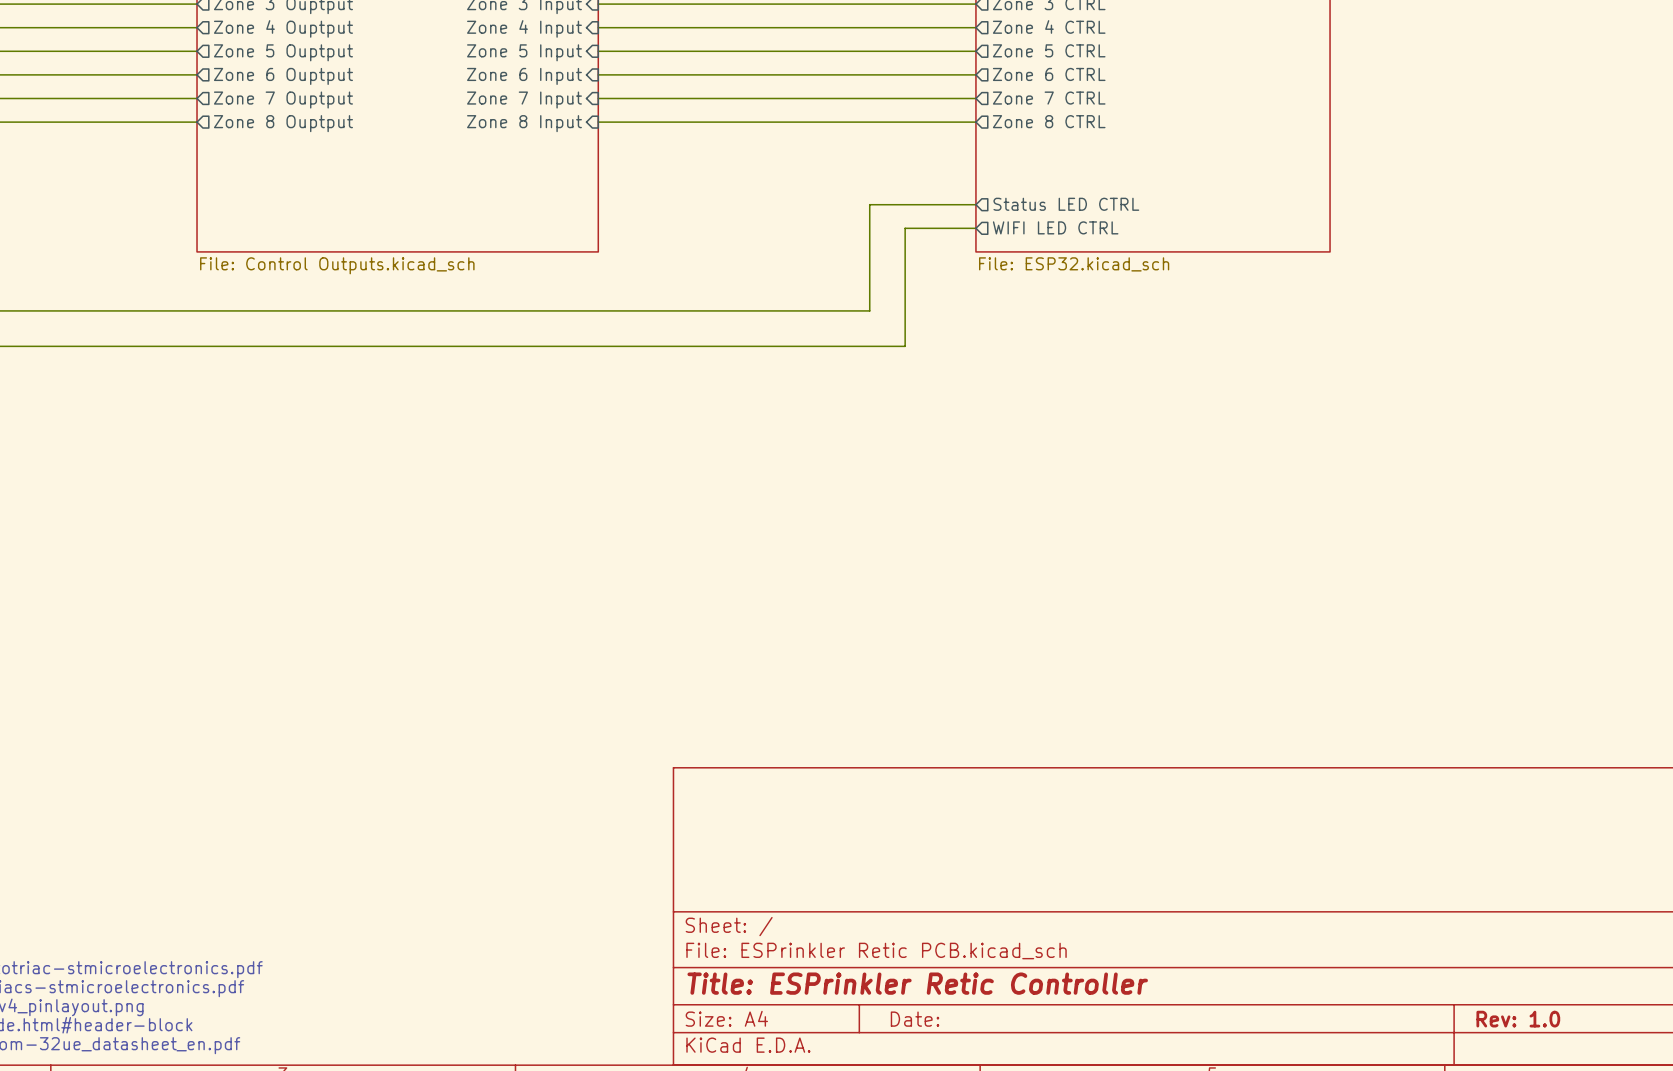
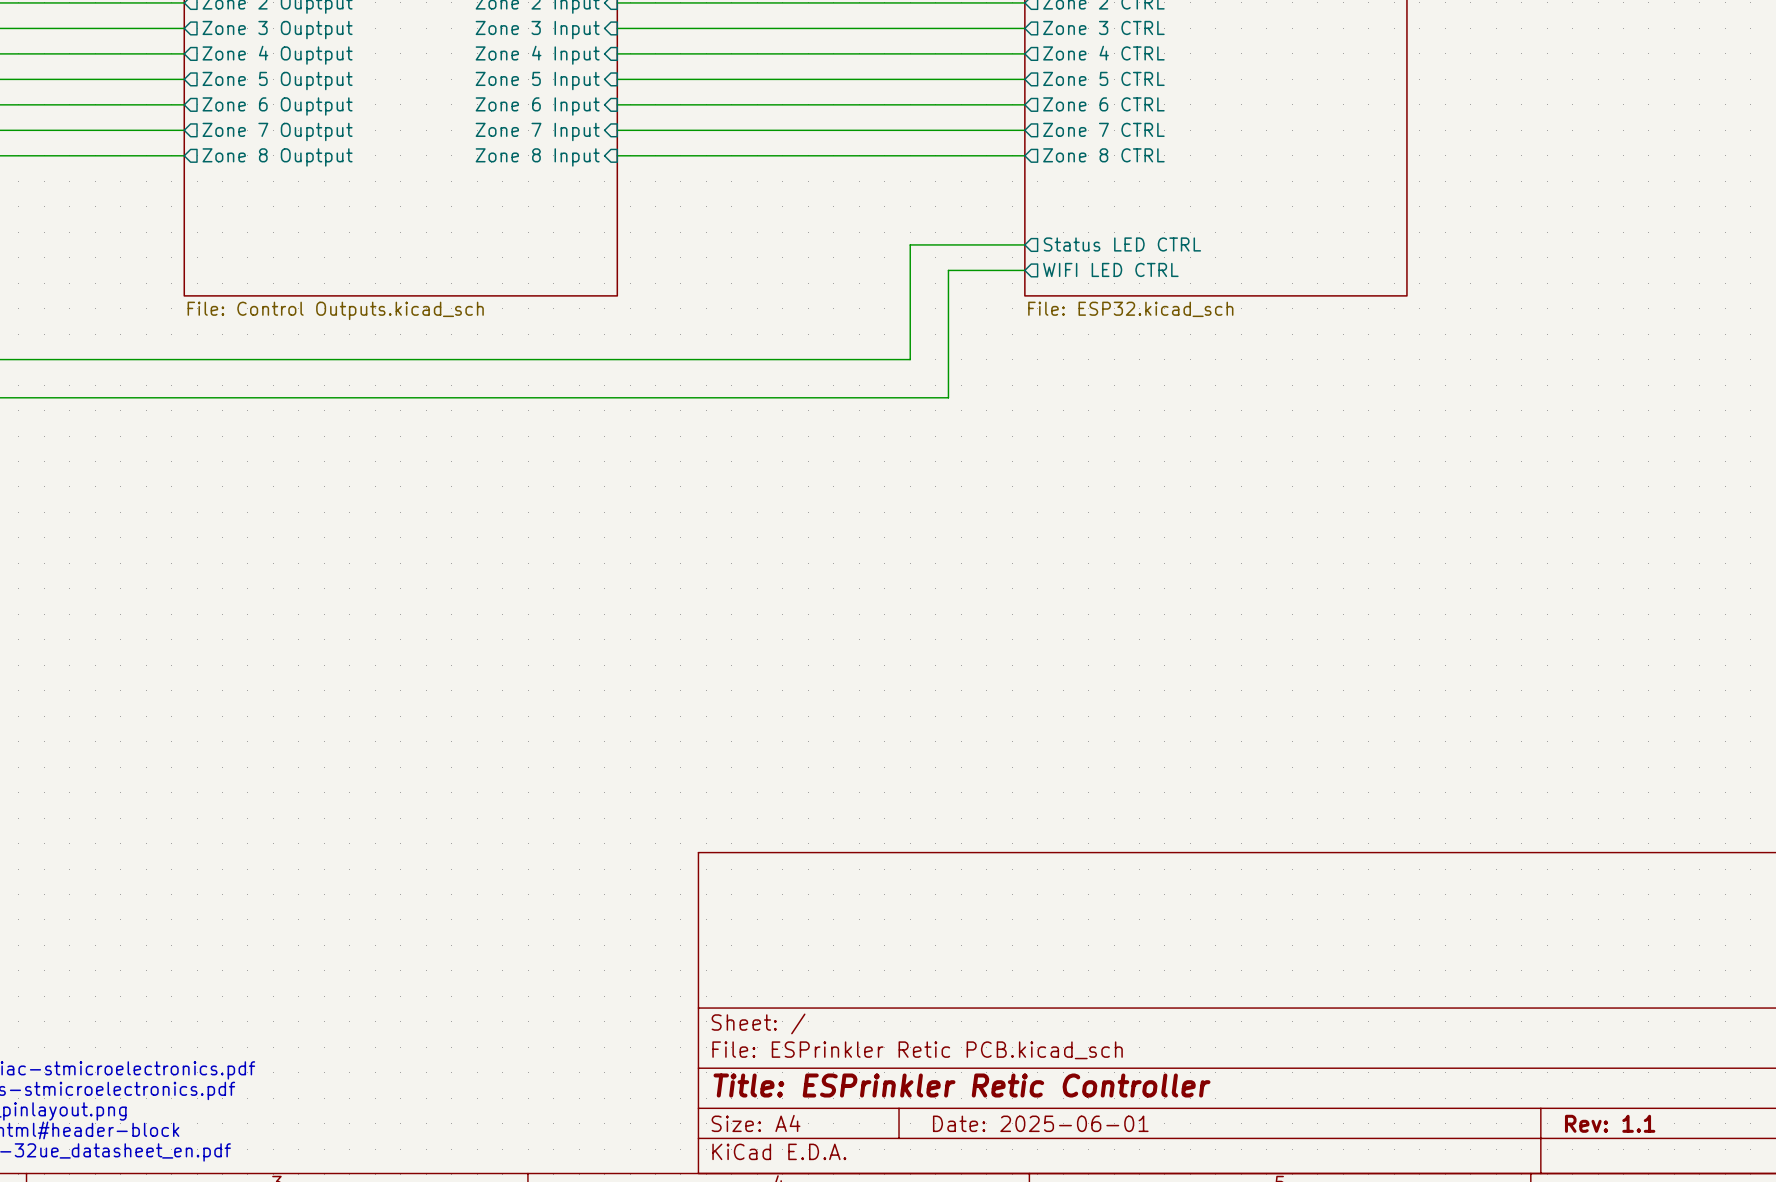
title block: Date: (915, 1019) -> Date: 2025-06-01 (1040, 1123)
title block: Rev: 1.0 (1518, 1019) -> Rev: 1.1 (1610, 1123)

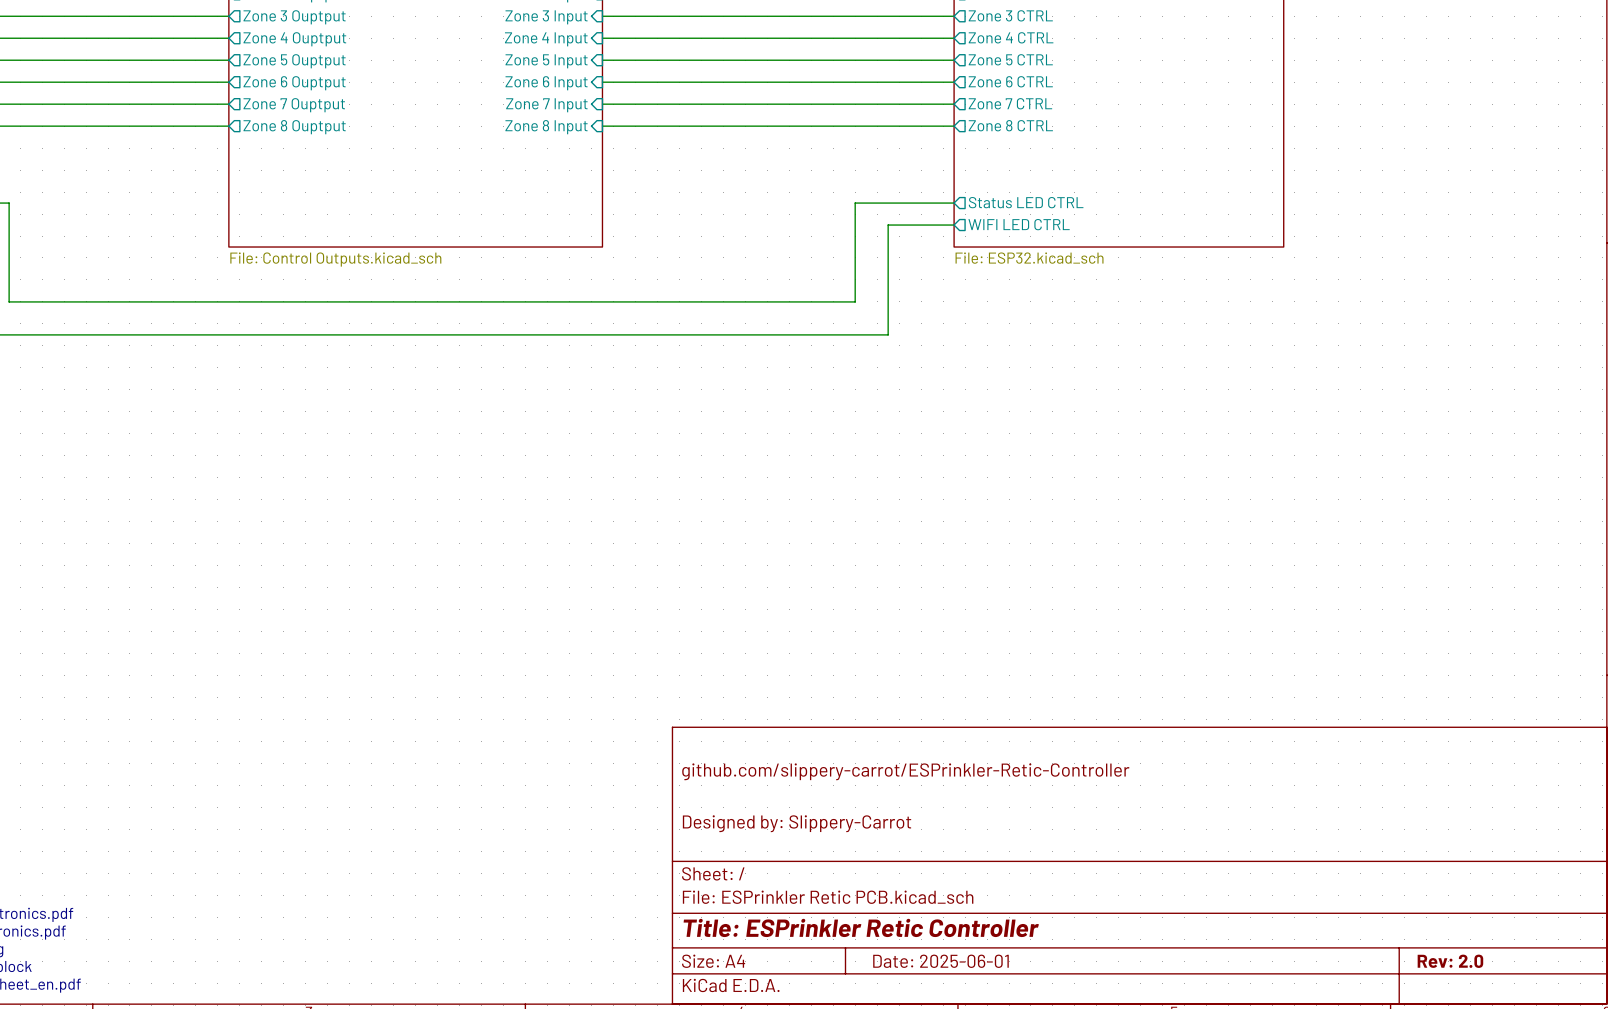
title block: none -> github.com/slippery-carrot/ESPrinkler-Retic-Controller (905, 771)
title block: none -> Designed by: Slippery-Carrot (797, 823)
title block: Rev: 1.1 (1610, 1123) -> Rev: 2.0 (1450, 961)

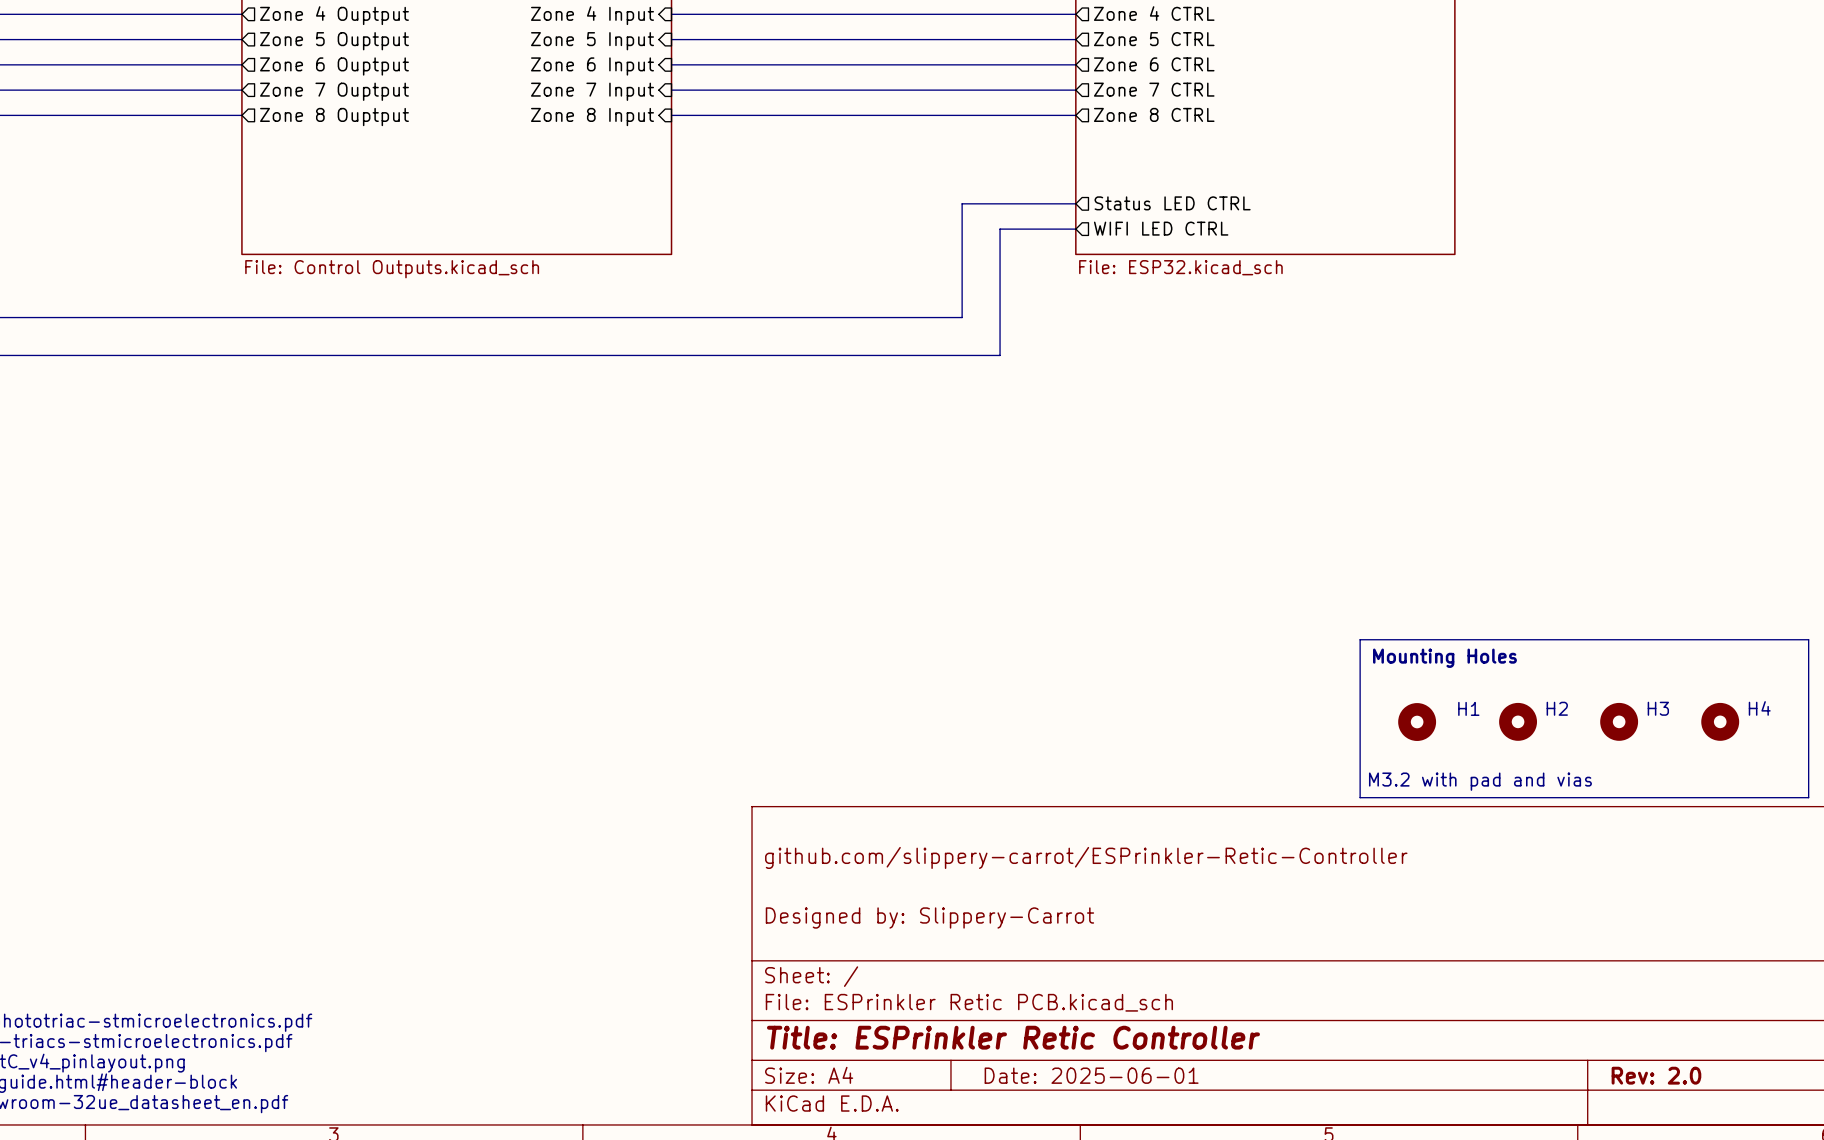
line: none -> (1360, 639) (1808, 639) (1808, 797) (1360, 797) (1360, 639)
text: none -> Mounting Holes (1444, 658)
H1: none -> (1417, 722)
H2: none -> (1518, 721)
H3: none -> (1619, 721)
H4: none -> (1720, 721)
text: none -> M3.2 with pad and vias (1480, 781)

